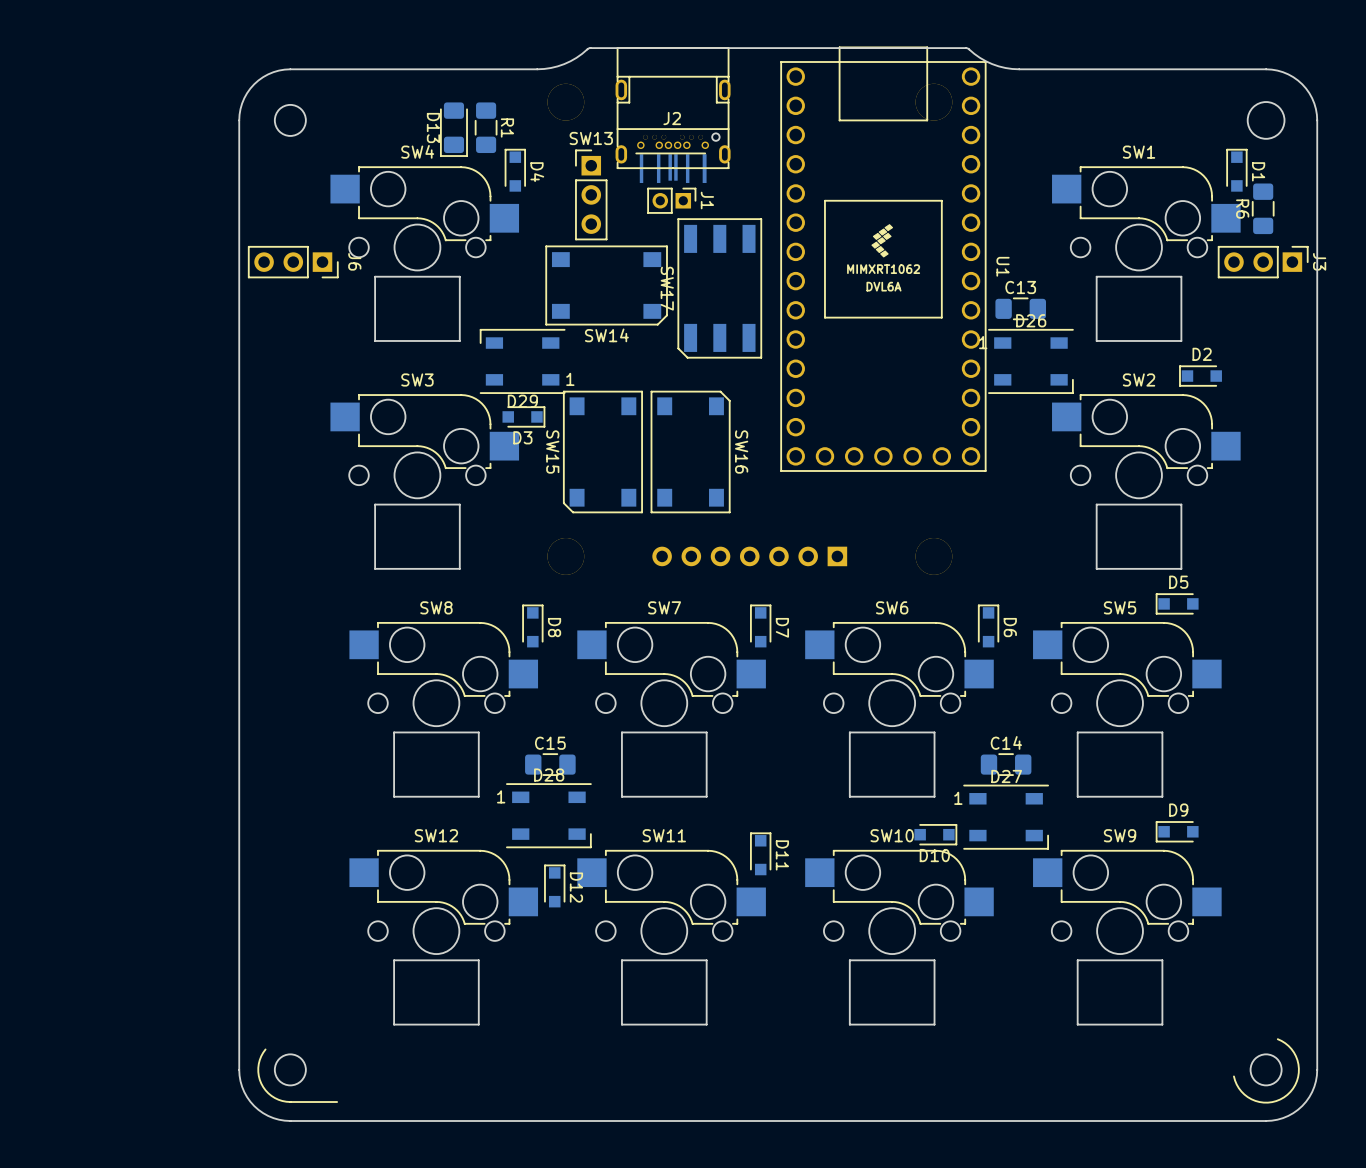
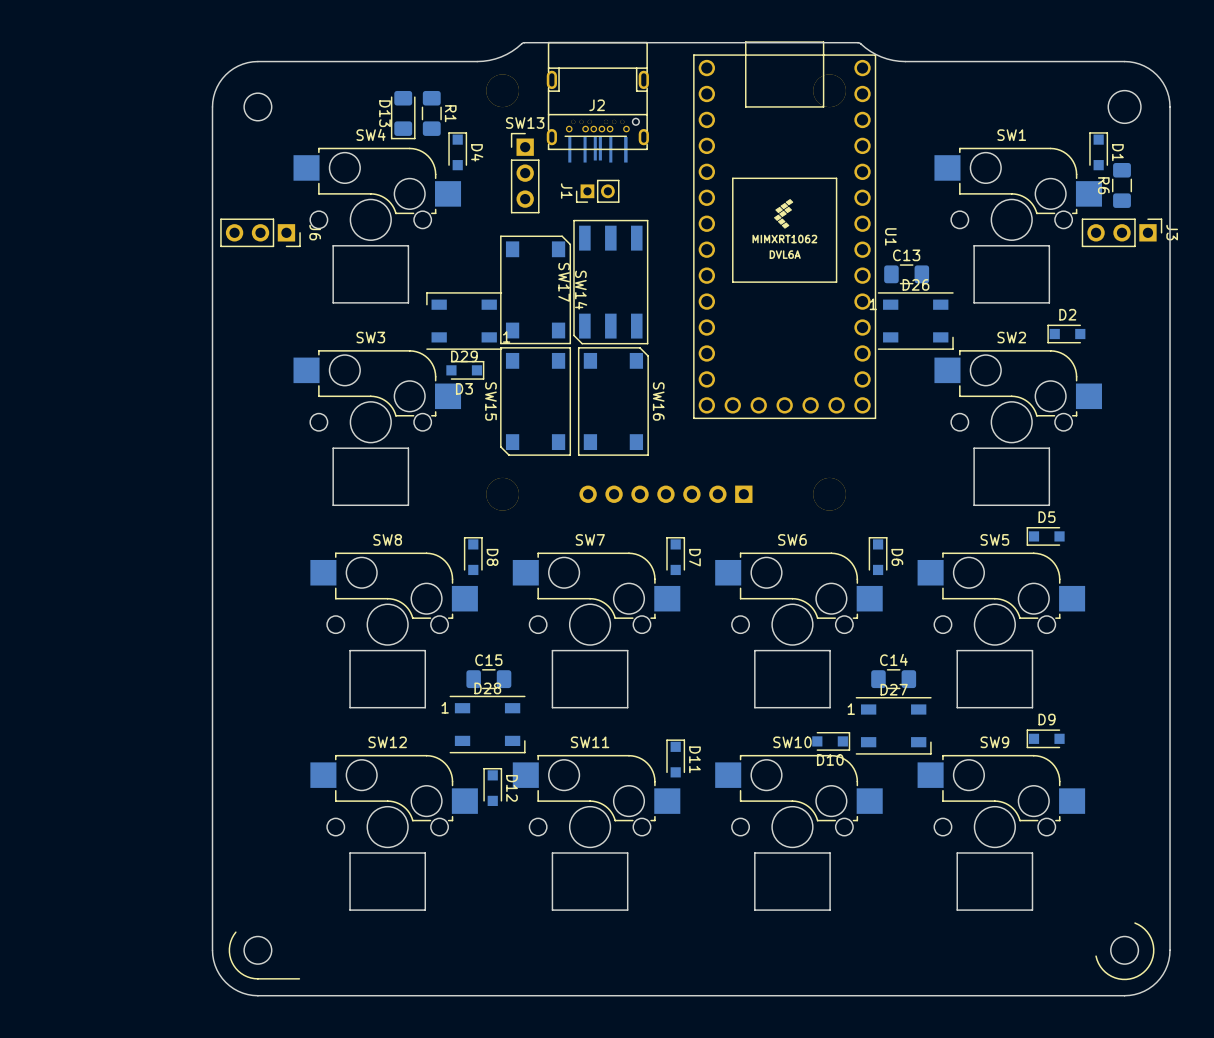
J1 rotation: 0° (671, 200) -> 180° (597, 191)
SW14 rotation: 0° (606, 285) -> 90° counterclockwise (535, 289)
SW17 position: (719, 288) -> (610, 282)

